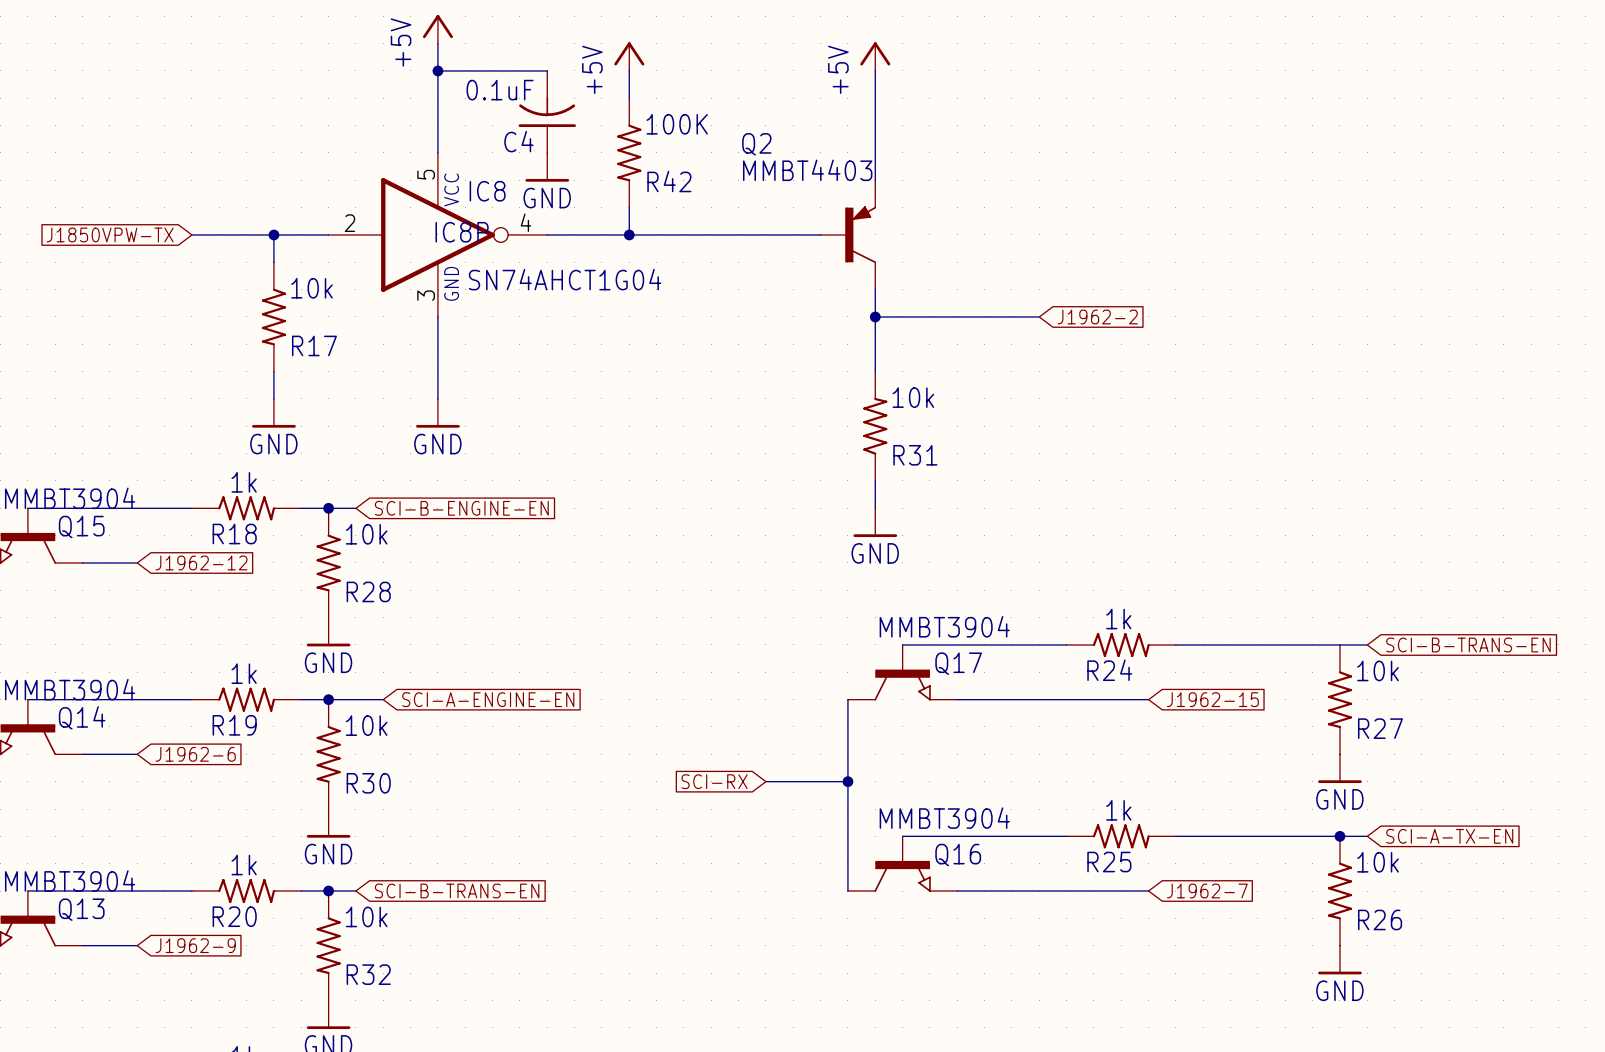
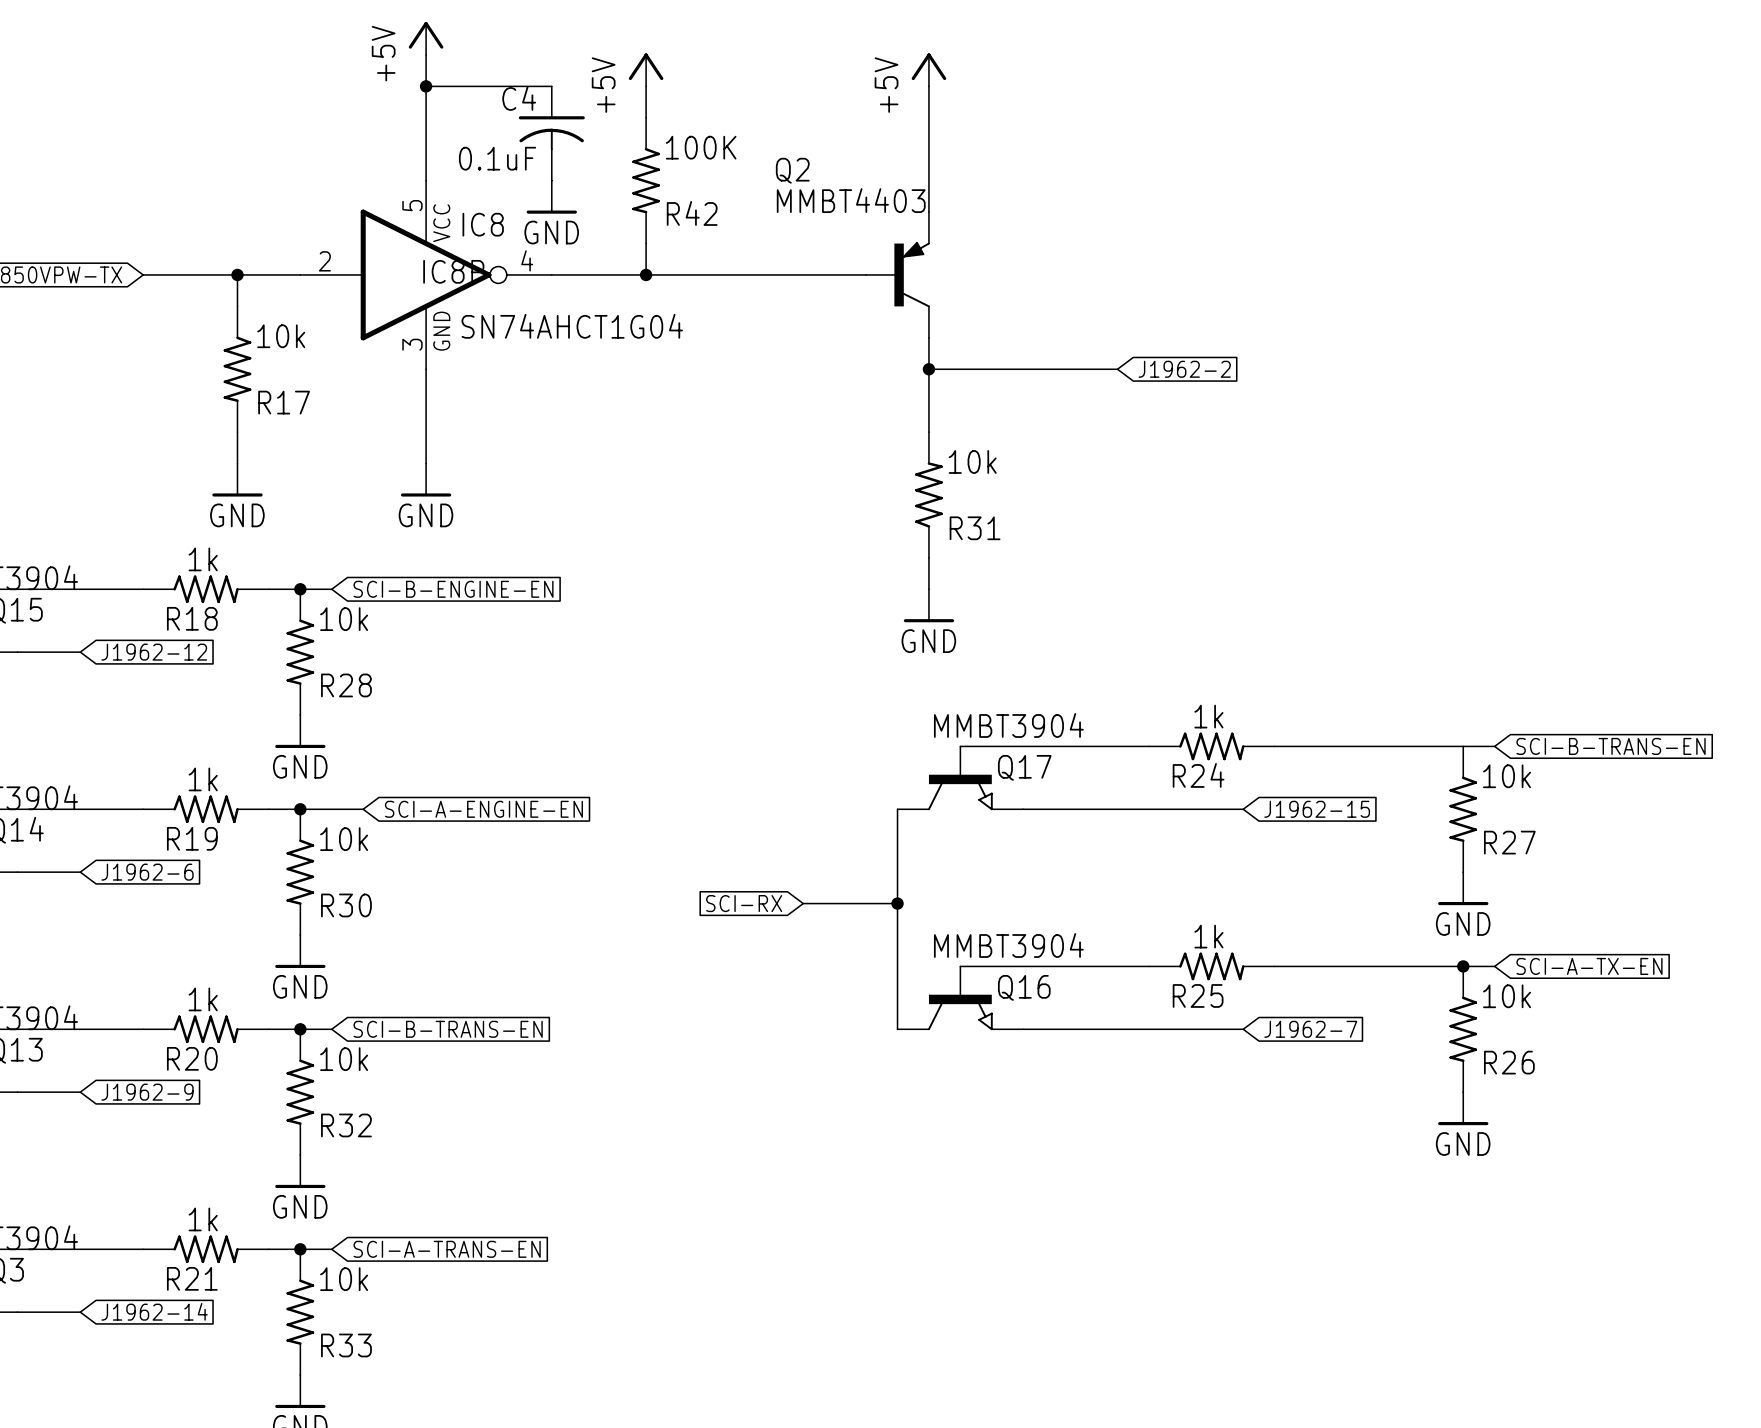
C4 value position: 0.1uF (500, 90) -> 0.1uF (497, 158)
C4 rotation: 0° (547, 112) -> 180° (551, 133)
C4 name position: C4 (518, 141) -> C4 (519, 98)

